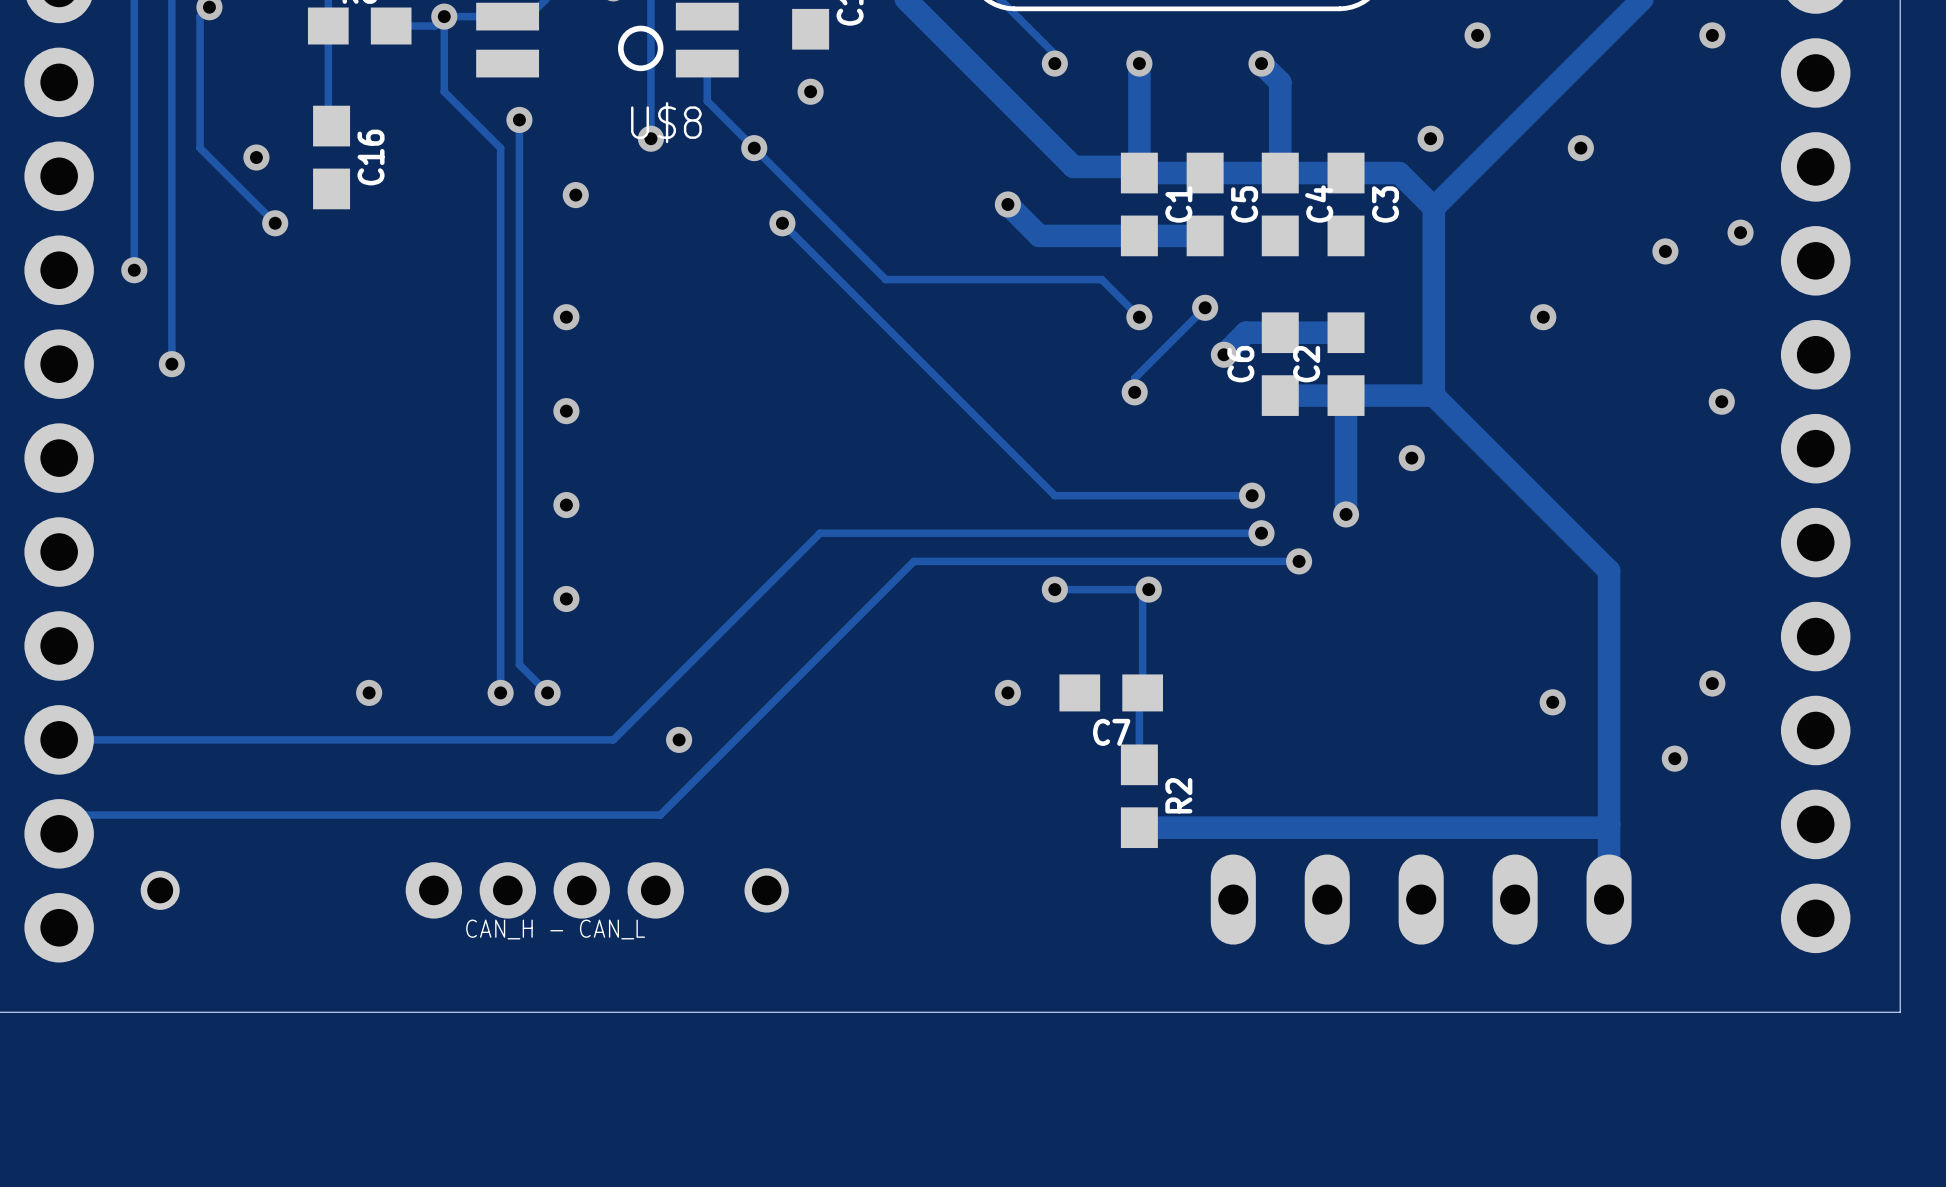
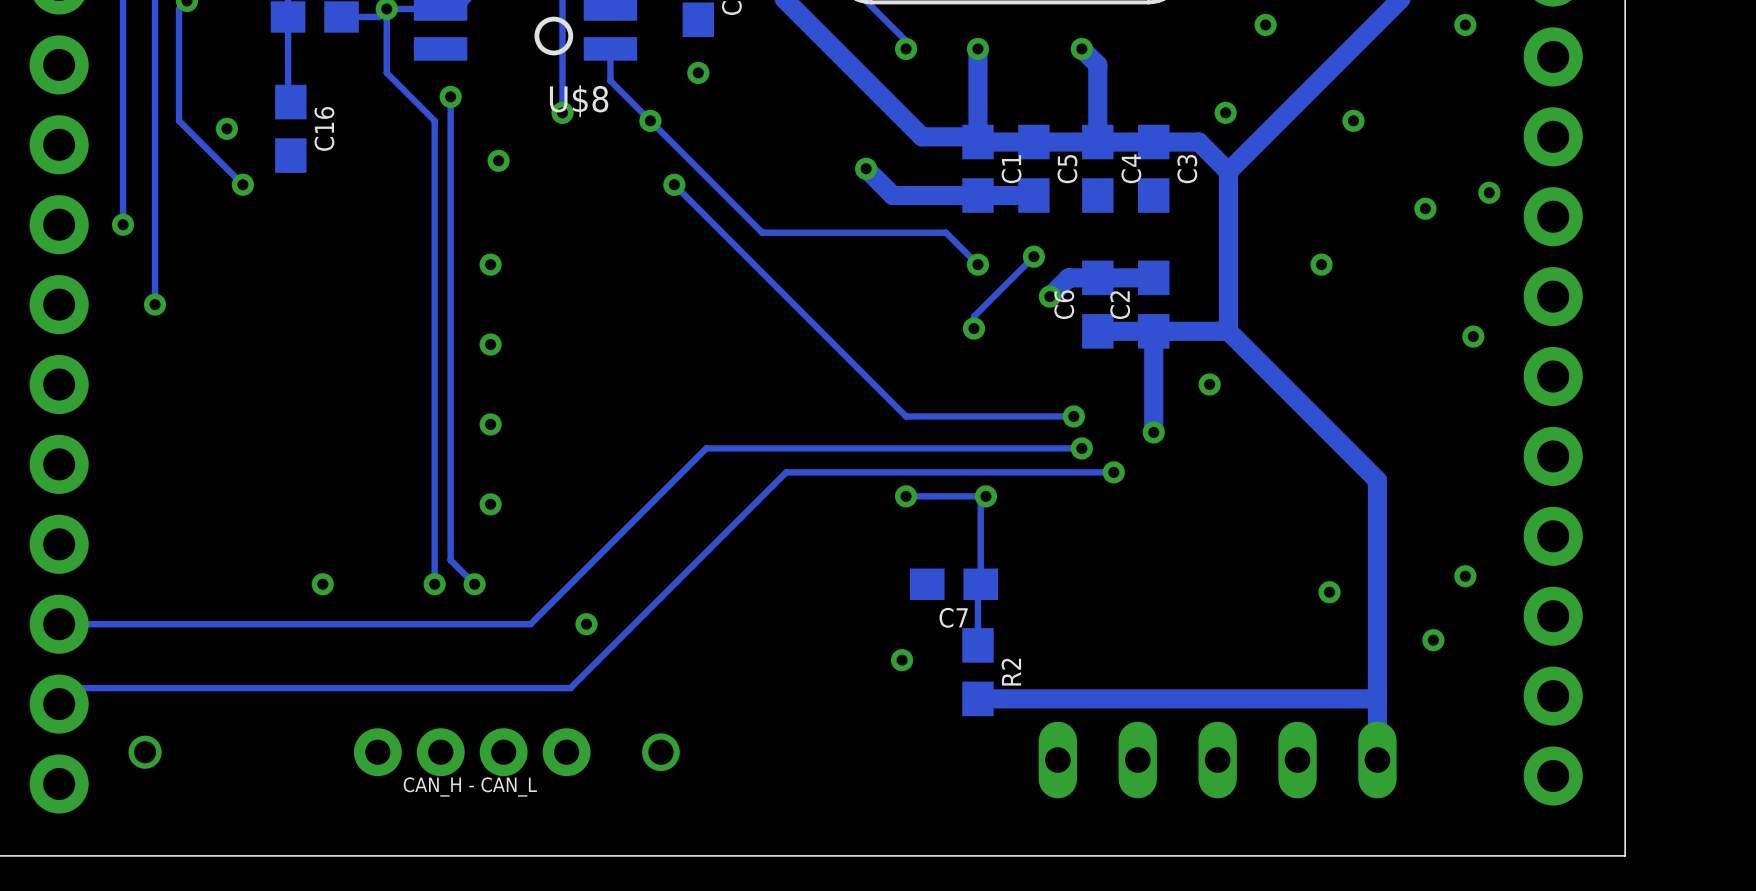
via position: (1007, 692) -> (902, 660)

